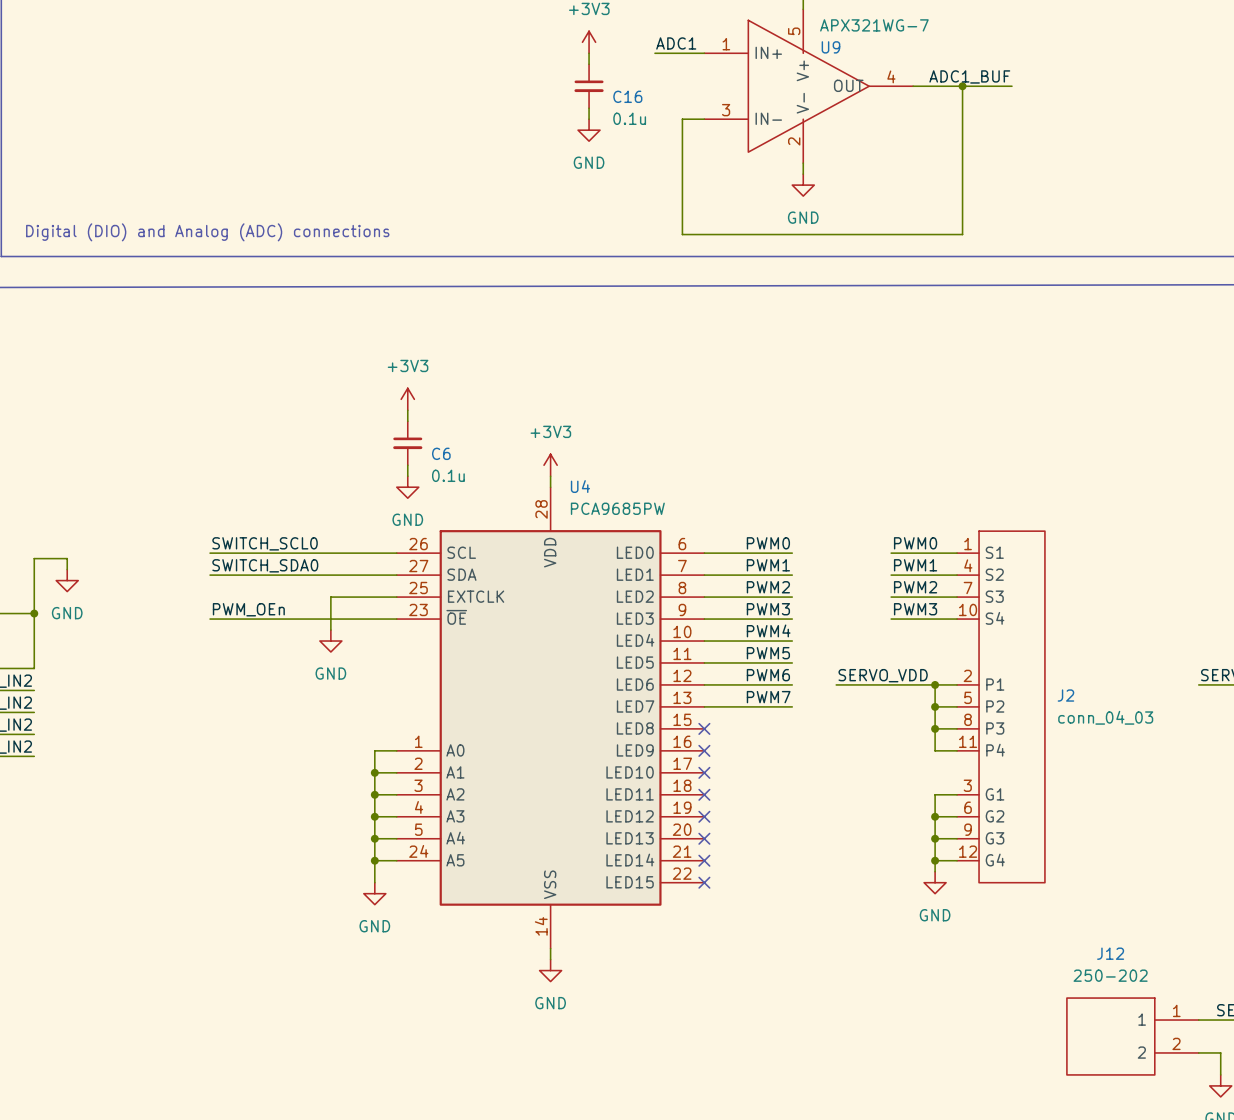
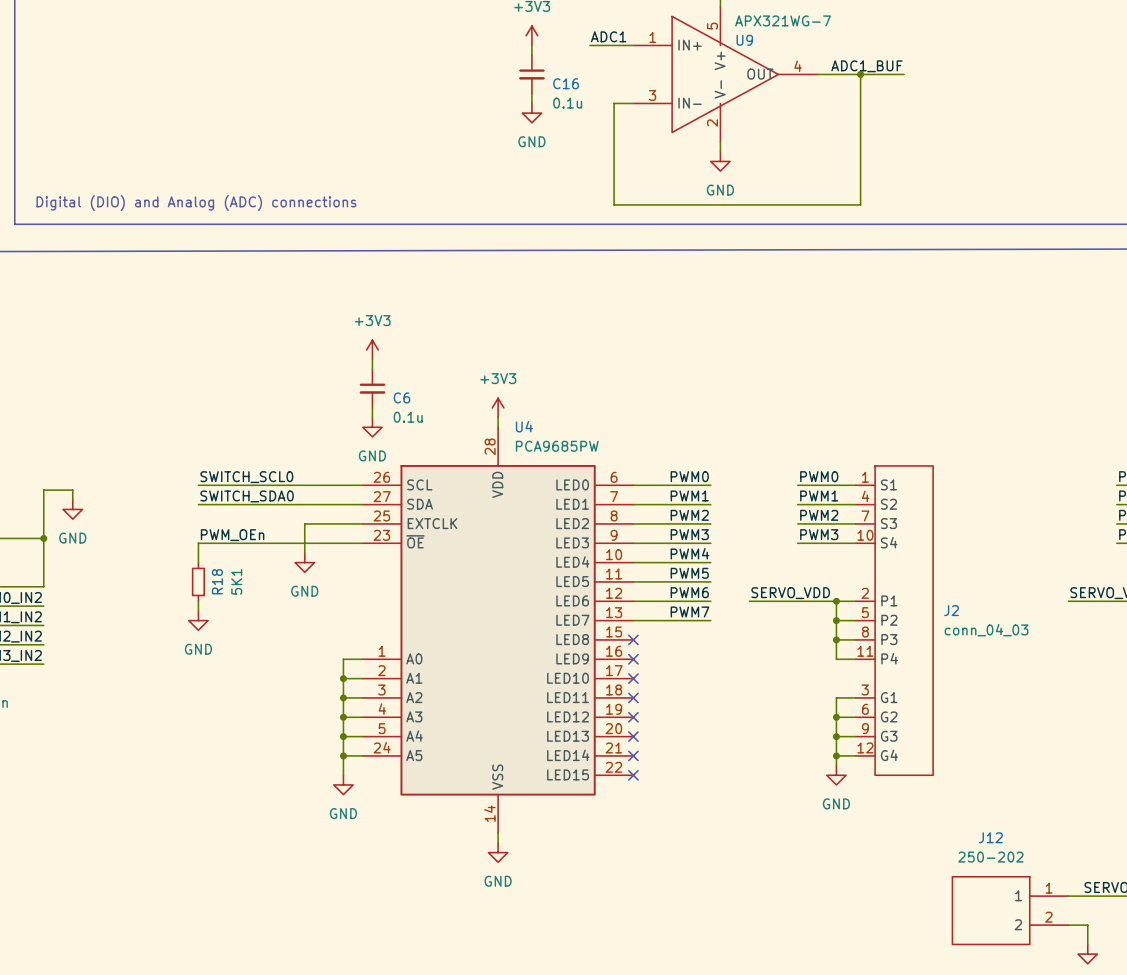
wire: none -> (198, 543) (198, 562)
R18: none -> 5K1 (198, 581)
wire: none -> (198, 601) (198, 610)
power symbol: none -> GND (198, 620)

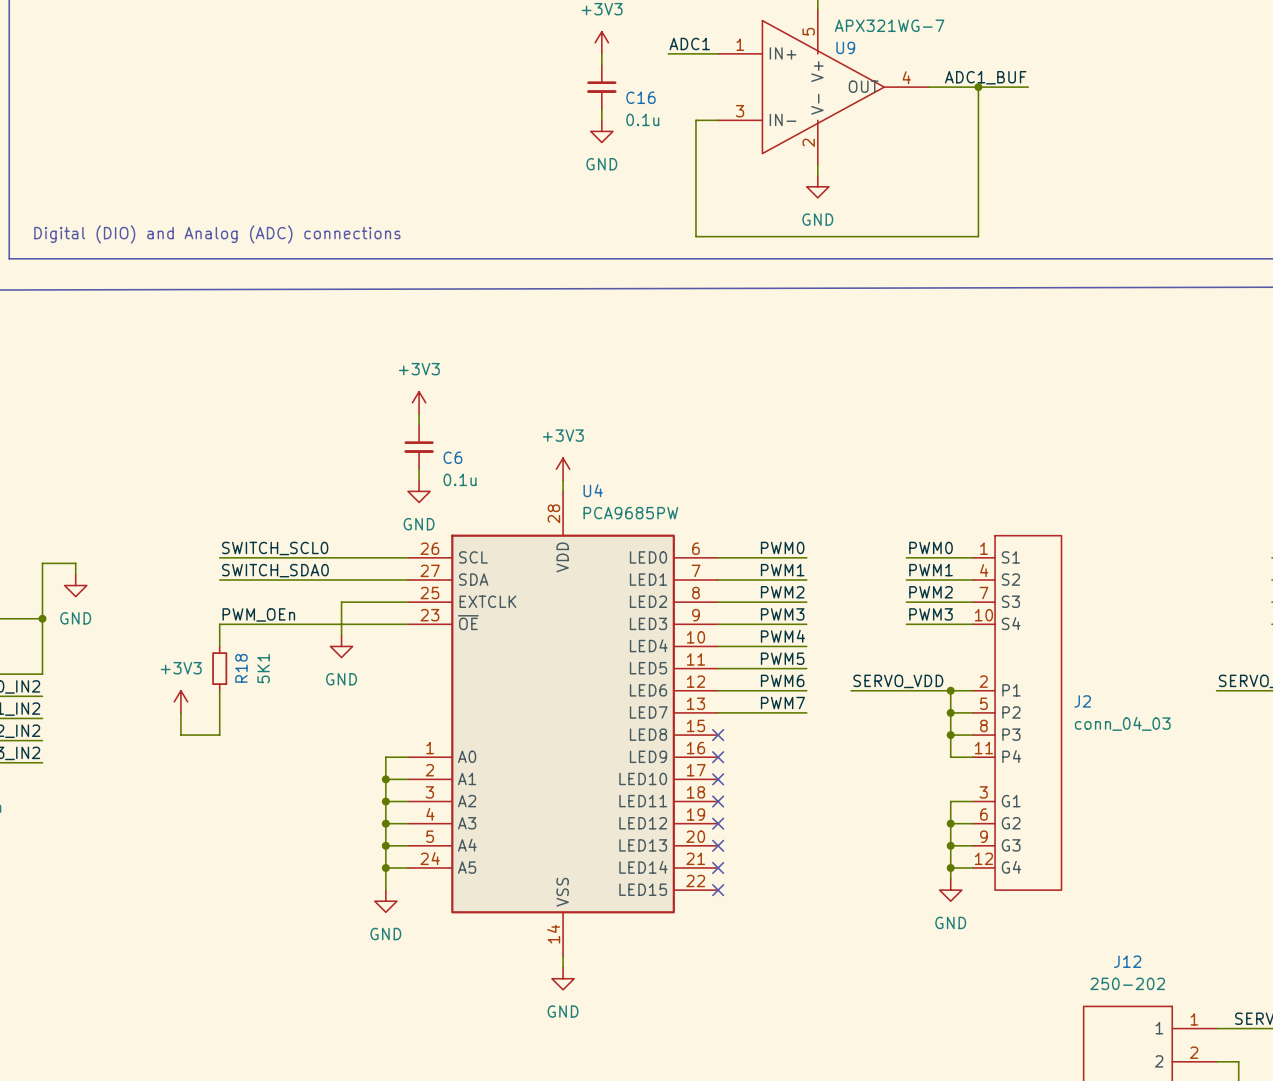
power symbol: none -> +3V3 (180, 701)
wire: none -> (219, 701) (219, 735) (180, 735) (180, 712)
power symbol: GND (198, 620) -> none

